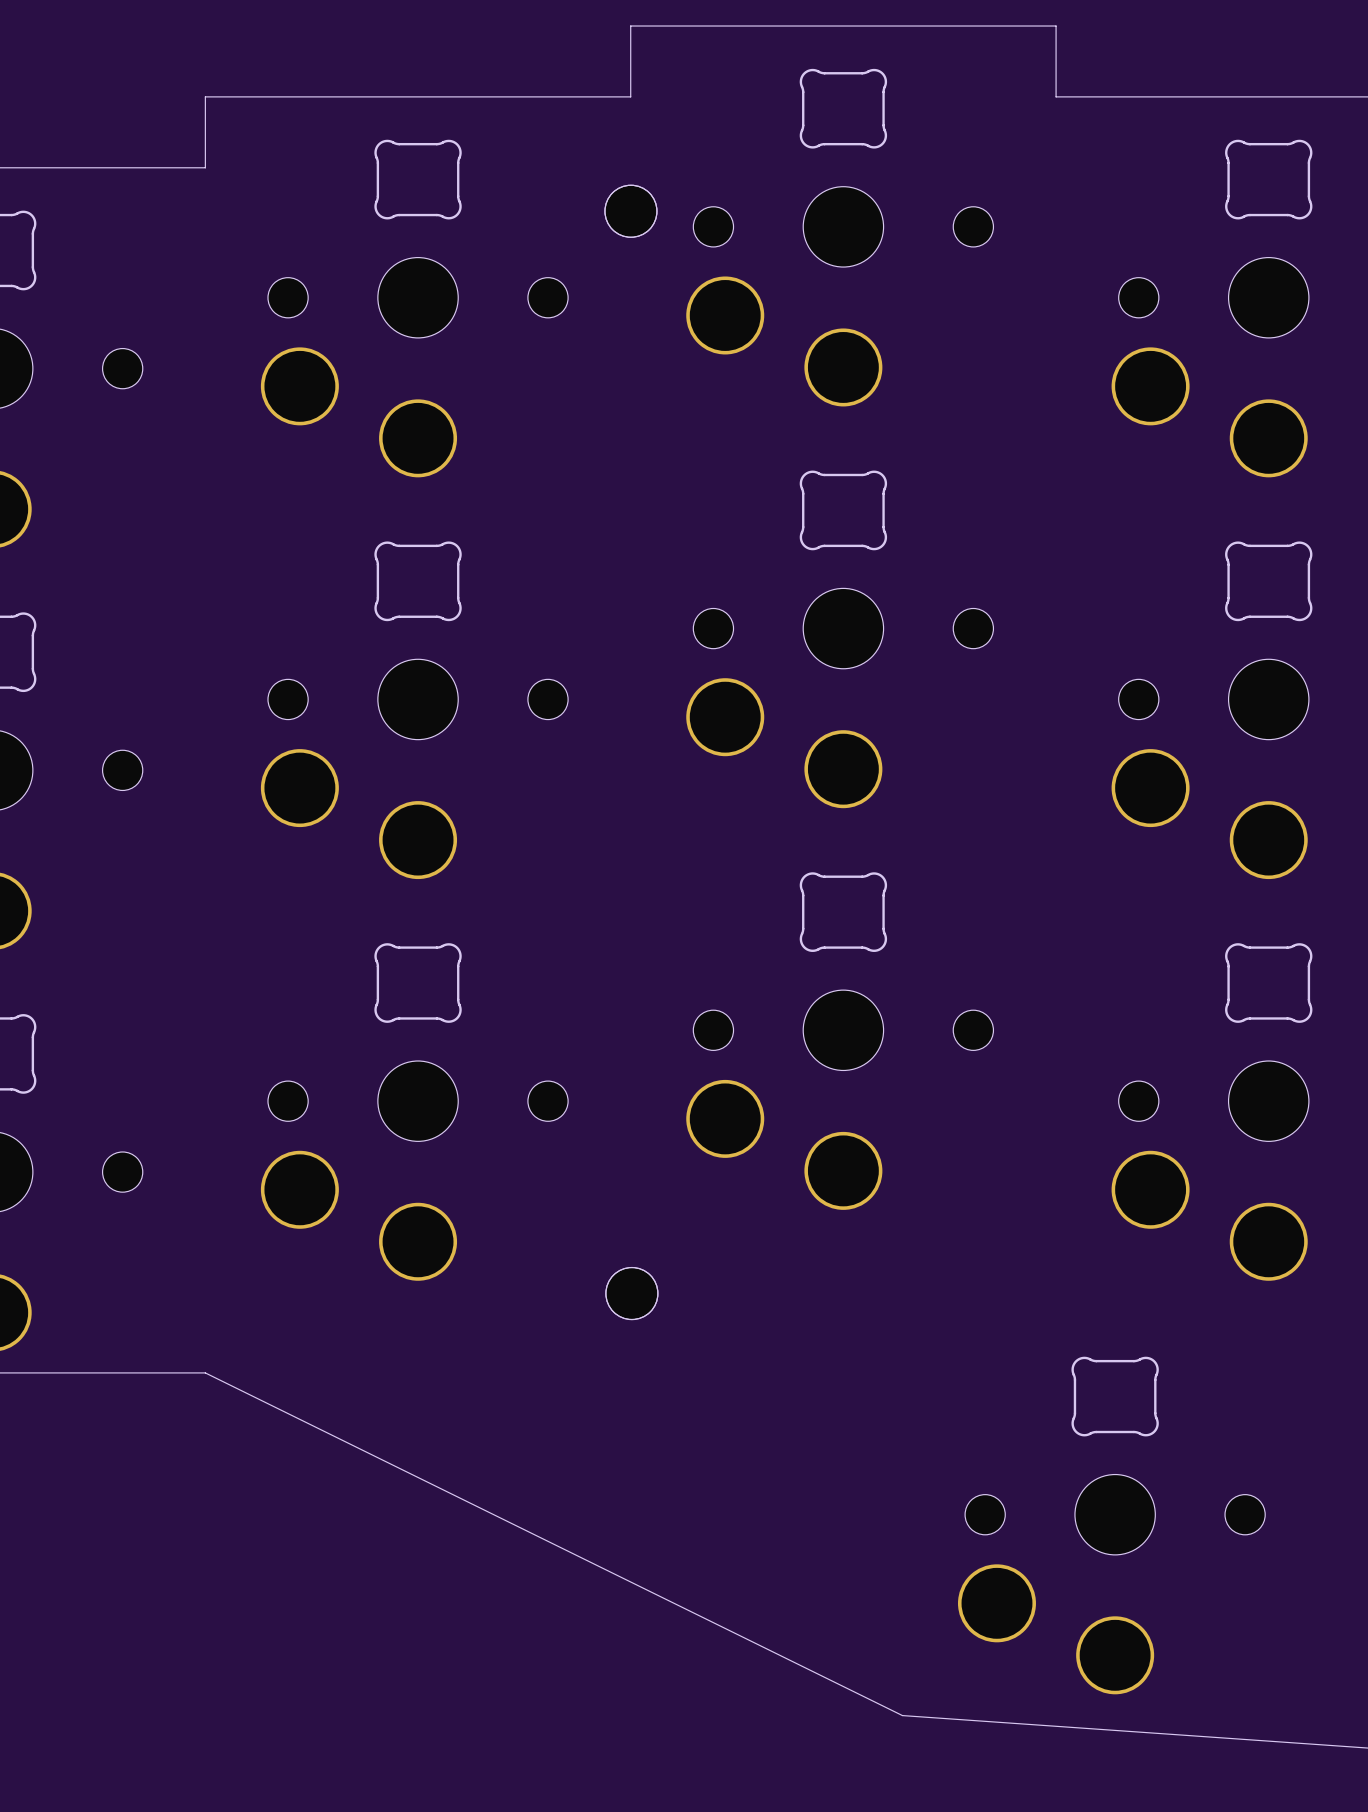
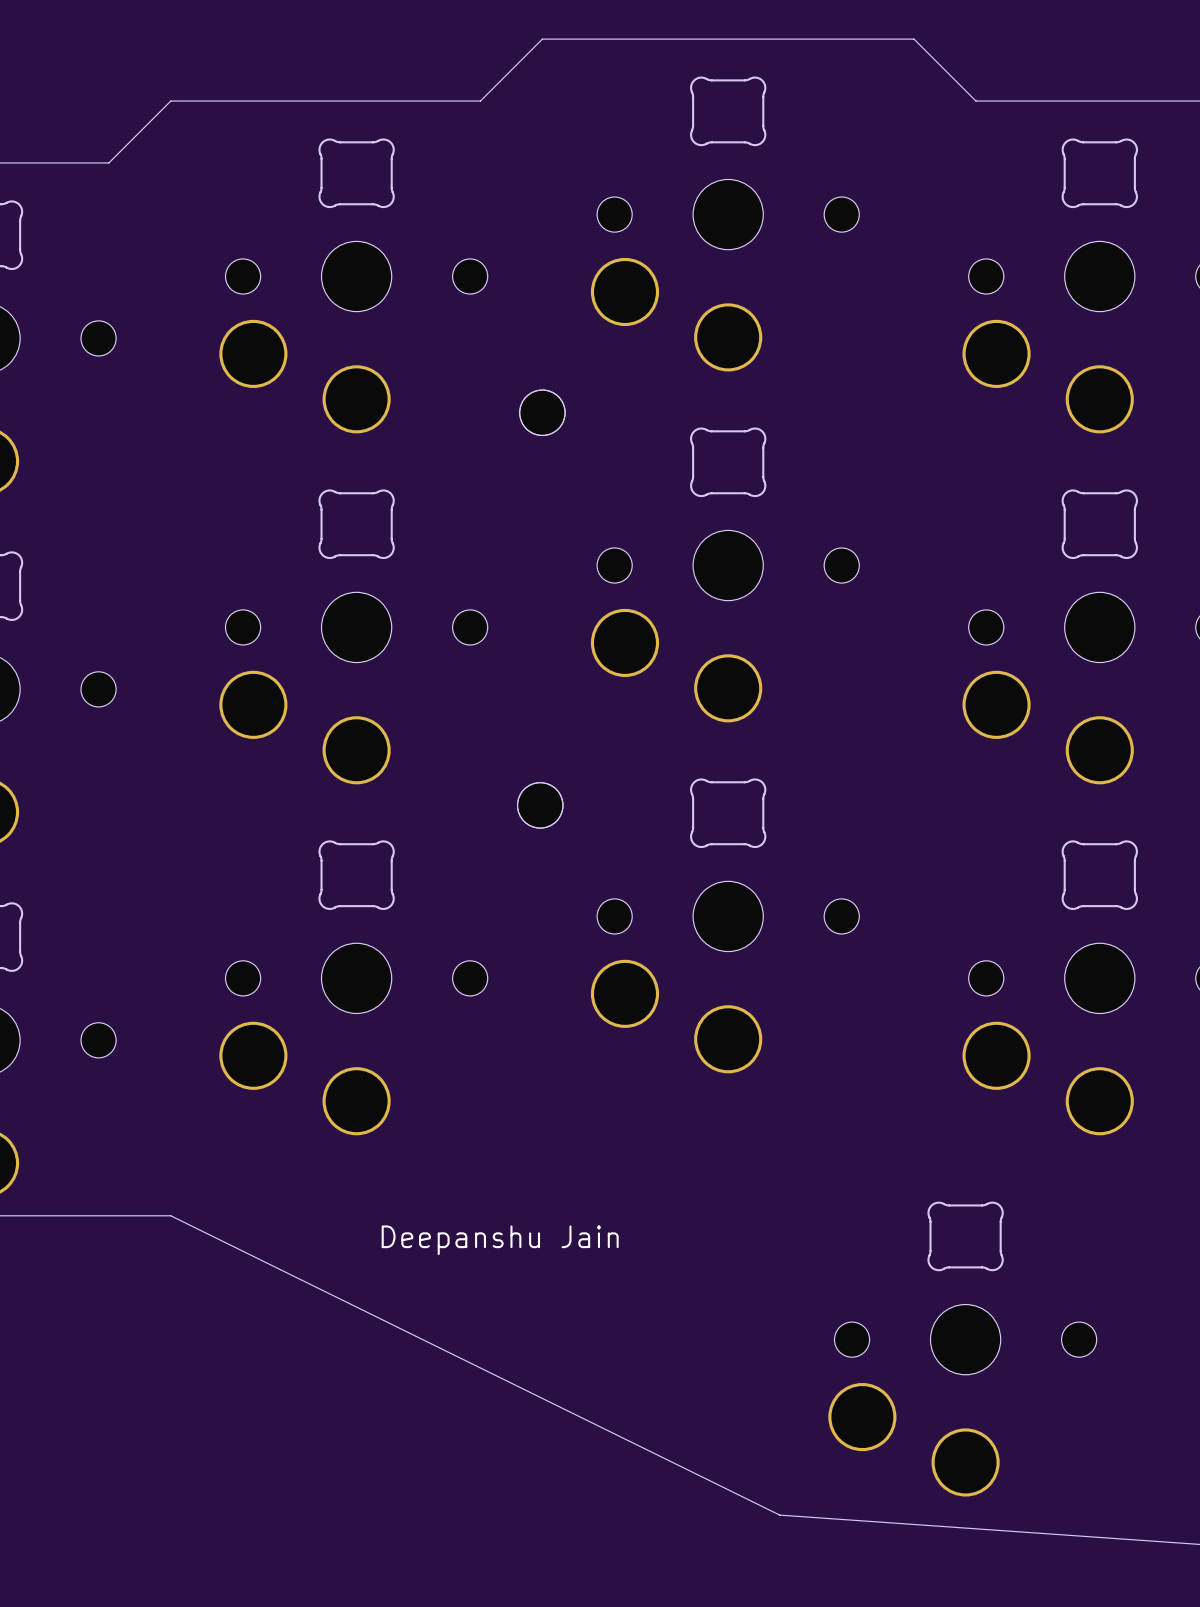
board edge: (630, 26) (630, 96) (559, 96) -> (542, 39) (480, 101)
board edge: (1056, 26) (1056, 96) (1126, 96) -> (913, 39) (975, 101)
board edge: (205, 96) (205, 167) (134, 167) -> (170, 101) (108, 162)
part position: (630, 211) -> (542, 412)
part: none -> (540, 805)
part: (631, 1293) -> none
text: none -> Deepanshu Jain (500, 1240)

